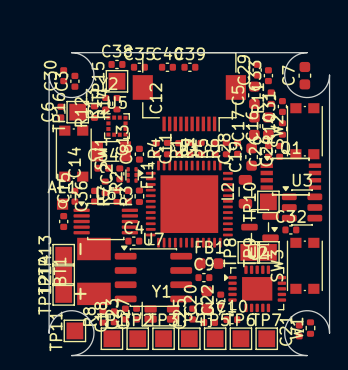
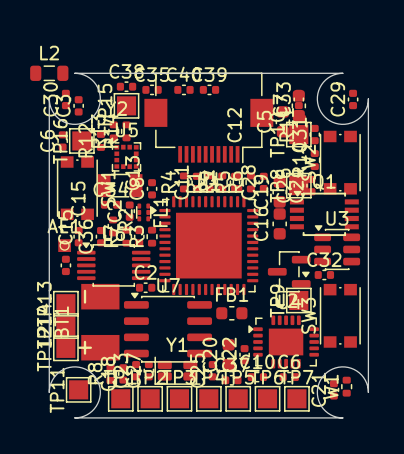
C29 position: (257, 70) -> (353, 99)
C7 position: (304, 75) -> (298, 105)
C17: (254, 126) -> none
C16 position: (268, 126) -> (279, 223)
C12 position: (156, 148) -> (235, 182)
C14 name: C14 (74, 162) -> C15 (78, 198)
L2 rotation: 0° (245, 191) -> 90° clockwise (49, 73)
L2 position: (245, 191) -> (49, 73)
TP10 position: (268, 201) -> (298, 134)
C4 name: C4 (134, 227) -> C2 (145, 272)
TP8 position: (248, 252) -> (298, 185)
C9: (203, 277) -> none
C6: none -> (289, 377)

